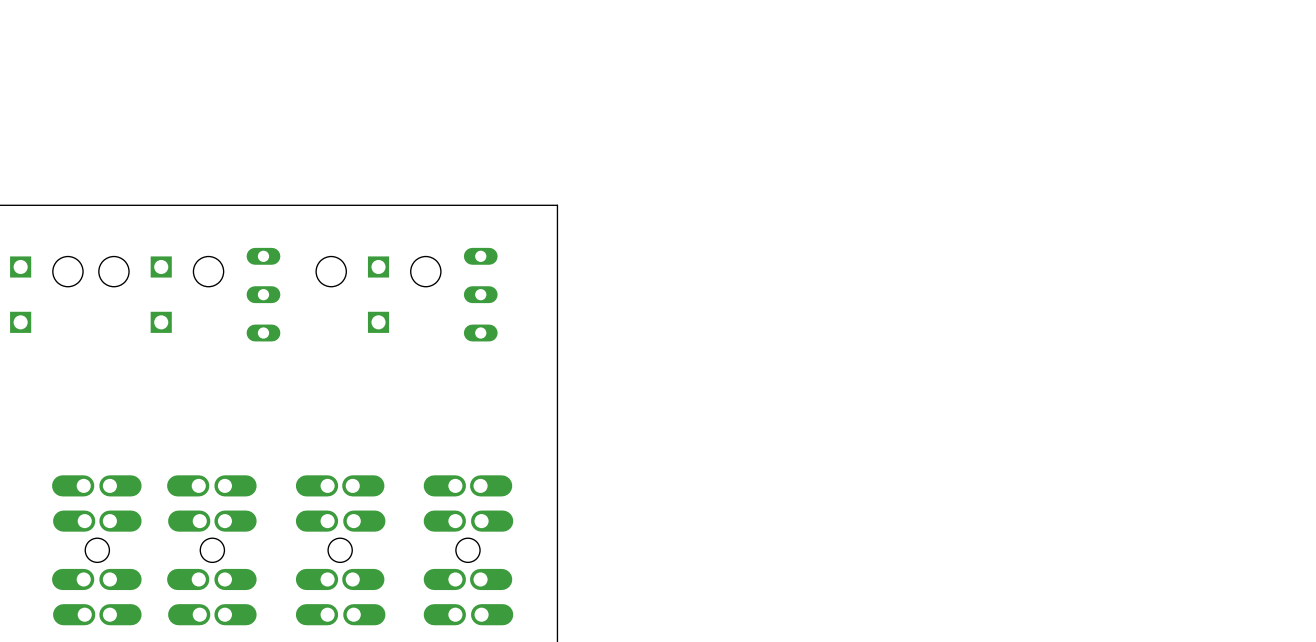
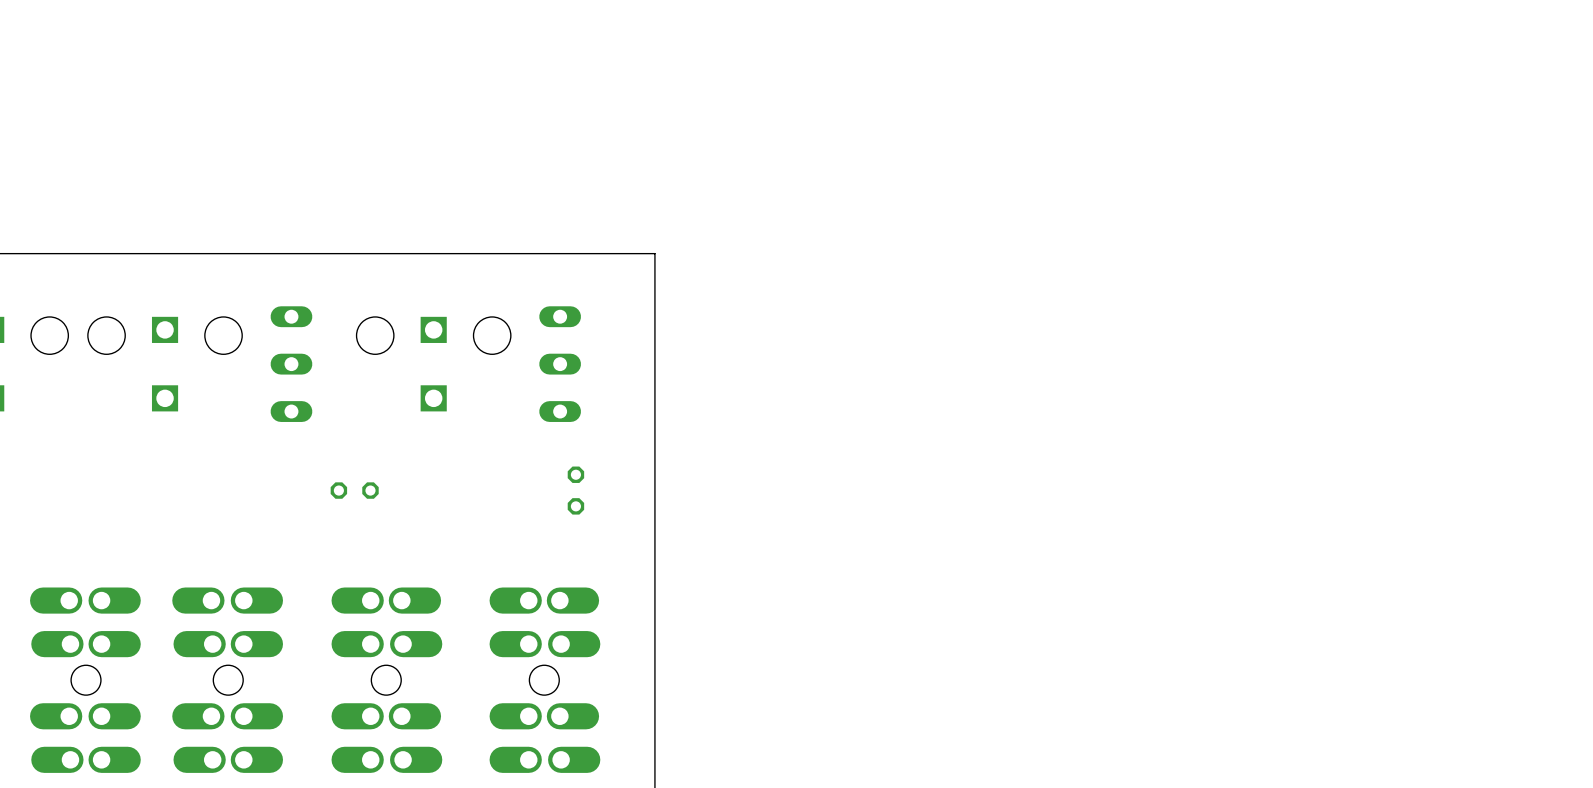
part: none -> (354, 490)
part: none -> (575, 490)

